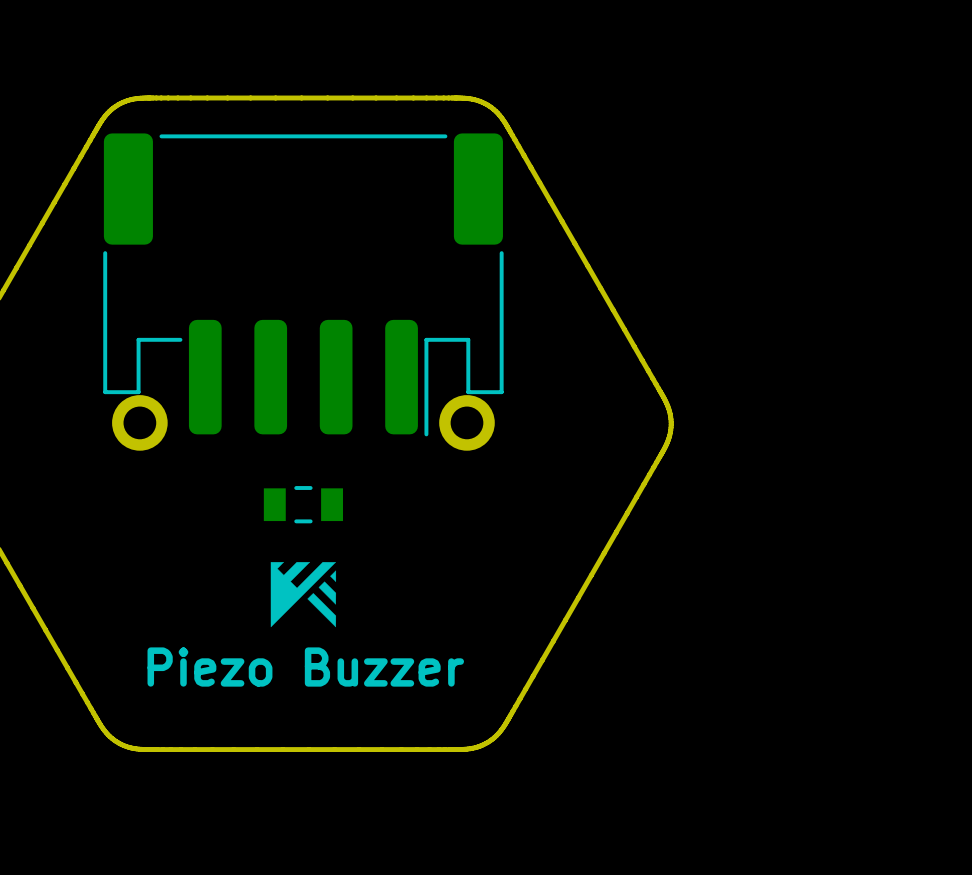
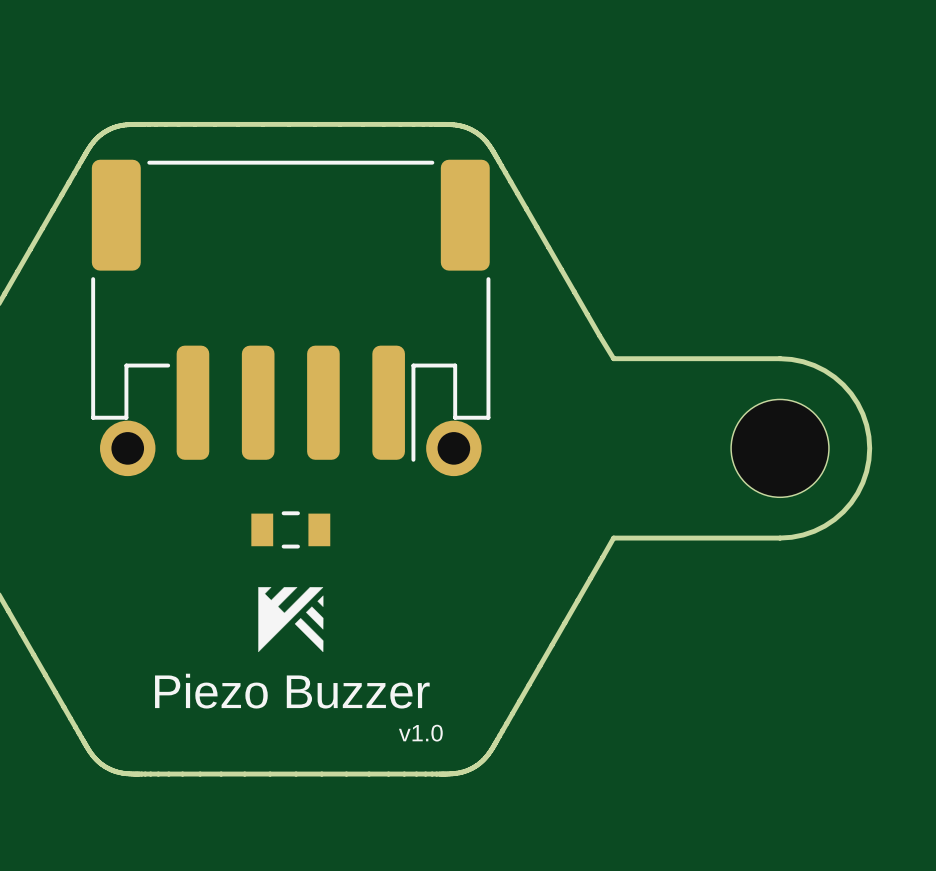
board edge: (613, 309) (664, 399) (671, 422) (669, 435) (665, 447) (616, 532) -> (599, 335) (613, 358) (780, 358) (803, 361) (814, 365) (834, 377) (851, 393) (857, 403) (866, 425) (869, 448) (866, 471) (857, 493) (851, 502) (834, 519) (814, 531) (803, 535) (780, 538) (613, 538) (602, 557)
part: none -> (780, 448)
text: none -> v1.0 (420, 733)

